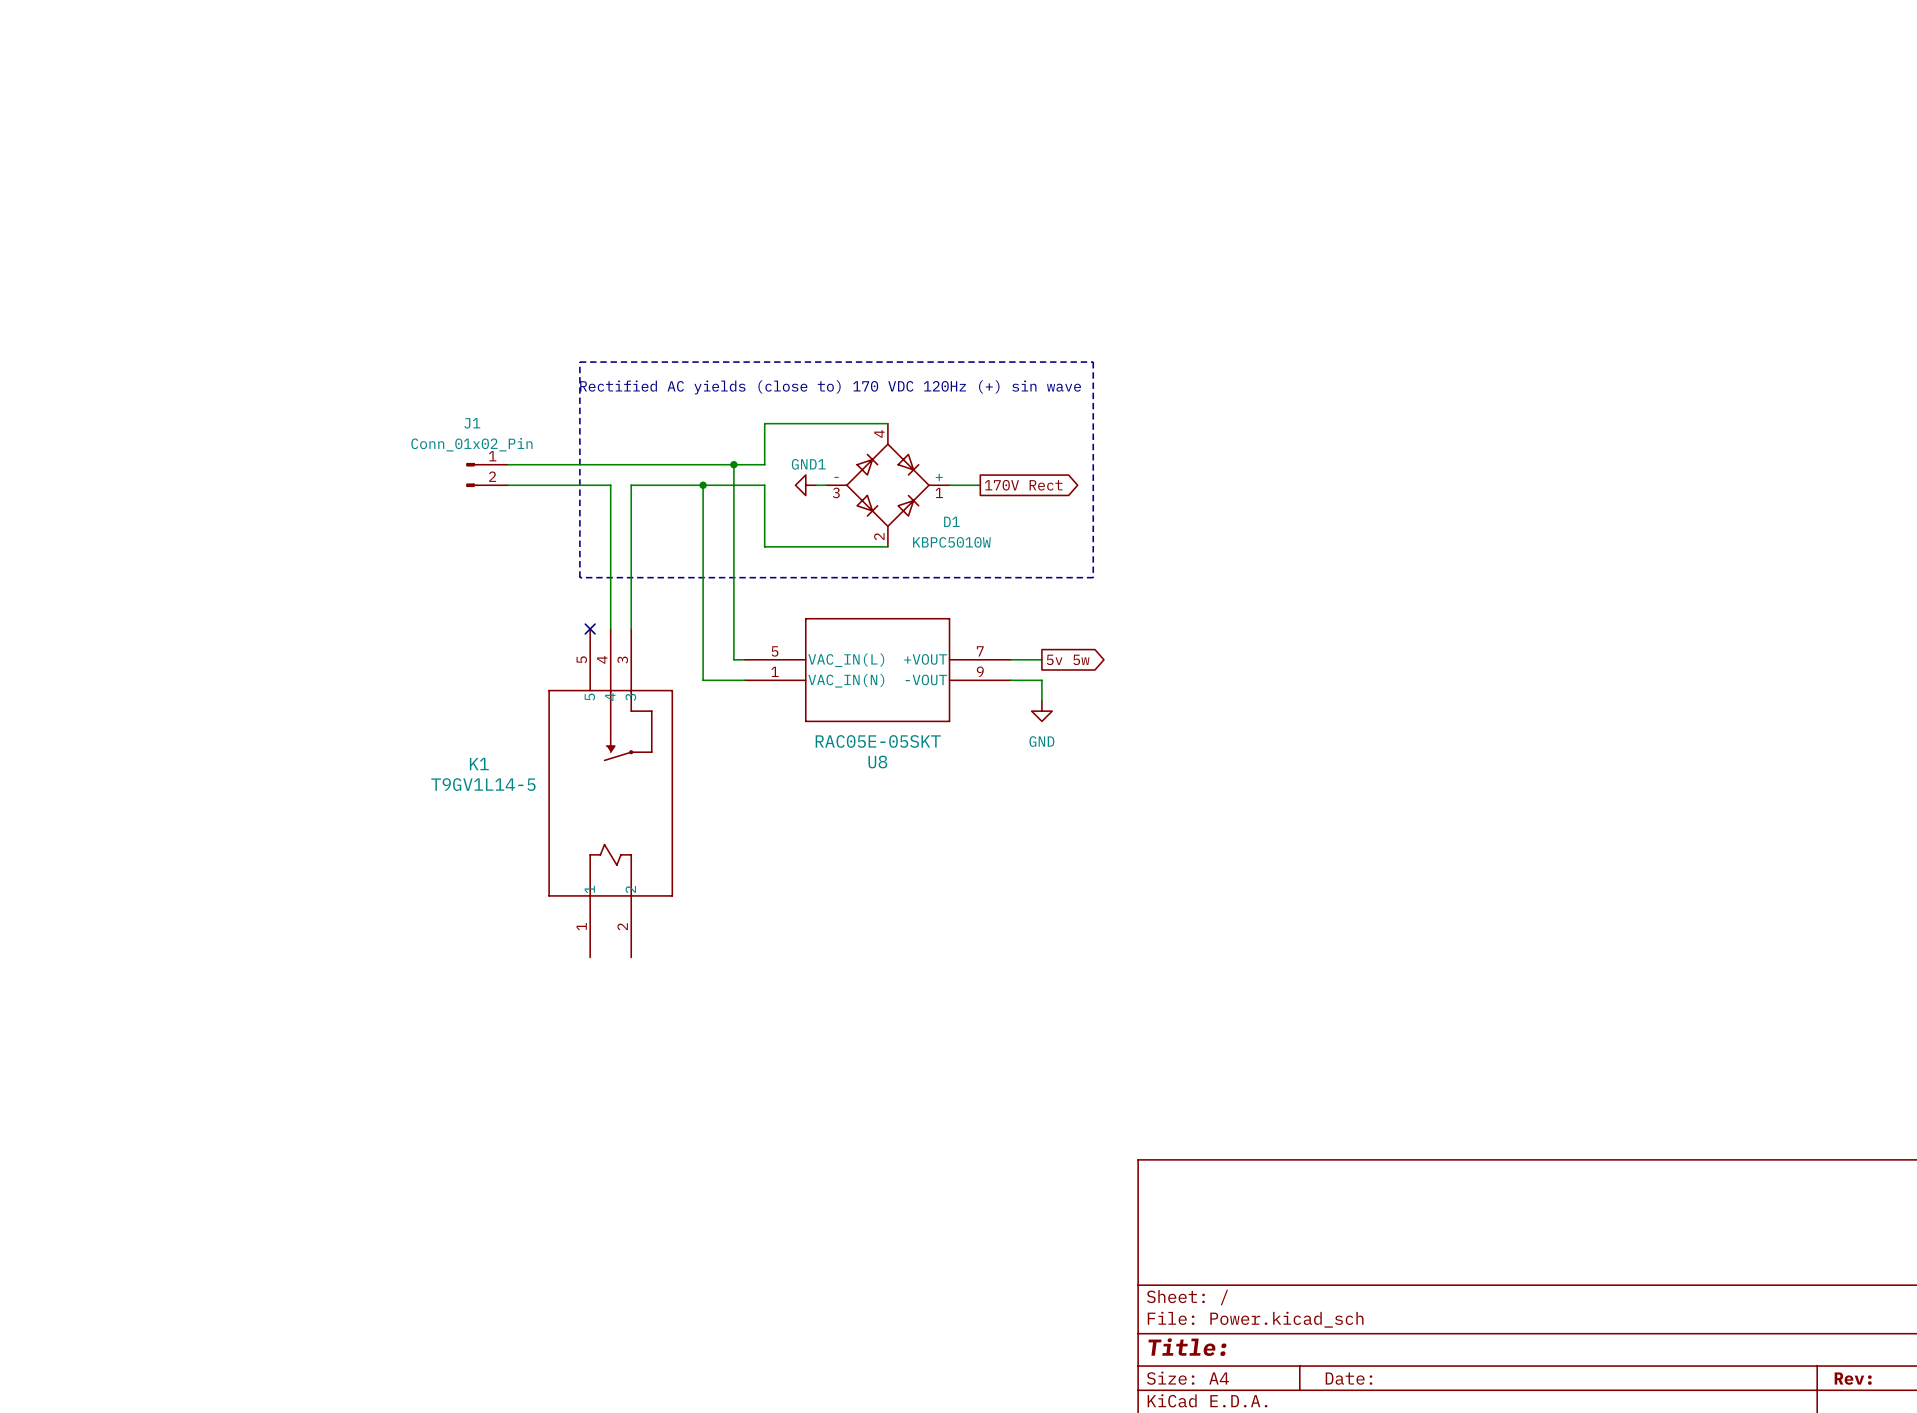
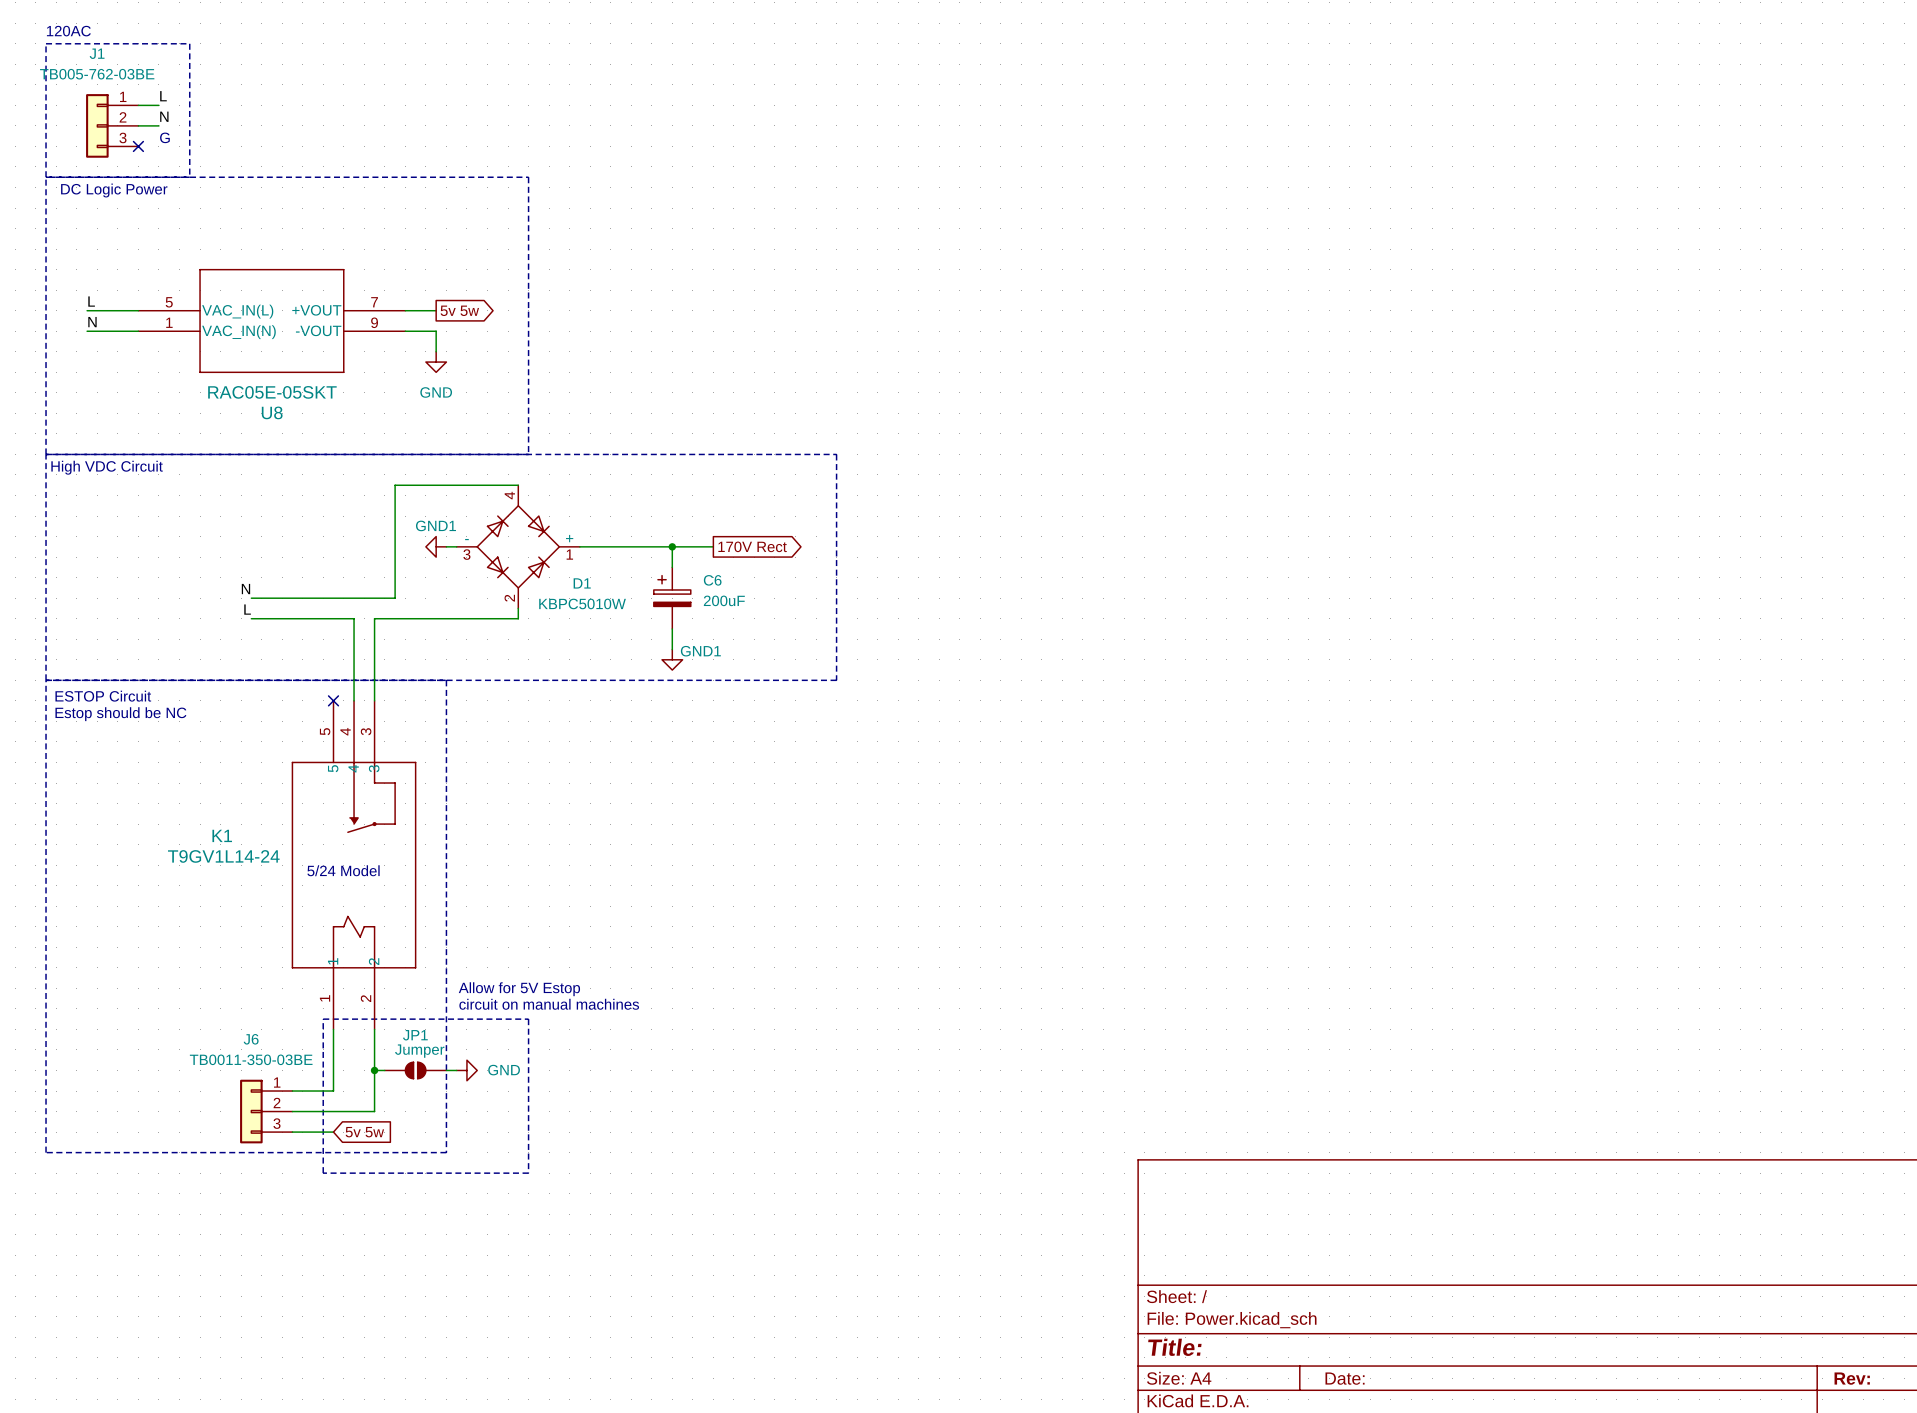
text: none -> 120AC (68, 31)
label: none -> L (163, 96)
wire: none -> (138, 105) (158, 105)
label: none -> N (164, 116)
wire: none -> (138, 125) (158, 125)
text: none -> G (164, 137)
no-connect mark: none -> (138, 146)
line: none -> (46, 177) (528, 177) (528, 454)
line: none -> (189, 177) (189, 43) (46, 43) (46, 1152) (446, 1152) (446, 680)
text: none -> DC Logic Power (114, 190)
label: none -> L (91, 301)
wire: none -> (87, 310) (138, 310)
wire: none -> (405, 310) (436, 310)
global label: none -> 5v 5w (459, 310)
label: none -> N (92, 322)
wire: none -> (87, 331) (138, 331)
wire: none -> (405, 331) (436, 331) (436, 351)
power symbol: none -> GND (436, 362)
line: (579, 362) (1093, 362) (1093, 577) (579, 577) (579, 362) -> none
text: Rectified AC yields (close to) 170 VDC 120Hz (+) sin wave (830, 387) -> none
J1 name position: J1 (472, 423) -> J1 (97, 53)
wire: (887, 423) (764, 423) (764, 464) (508, 464) -> none
J1 value: Conn_01x02_Pin (471, 444) -> TB005-762-03BE (97, 74)
line: none -> (46, 454) (836, 454) (836, 680) (46, 680)
J1 symbol: [466, 463, 509, 487] -> [86, 94, 139, 158]
wire: (733, 464) (733, 659) (744, 659) -> none
junction: (733, 464) -> none
text: none -> High VDC Circuit (107, 467)
wire: none -> (508, 485) (395, 485) (395, 598) (251, 598)
wire: (518, 485) (610, 485) (610, 628) -> none
wire: (703, 485) (703, 680) (744, 680) -> none
junction: (703, 485) -> none
power symbol: GND1 (805, 485) -> none
wire: (816, 485) (826, 485) -> none
D1 position: (887, 485) -> (518, 546)
wire: (949, 485) (980, 485) -> none
global label: 170V Rect (1023, 485) -> none
power symbol: none -> GND1 (436, 546)
wire: none -> (446, 546) (456, 546)
wire: none -> (579, 546) (713, 546)
wire: none -> (672, 546) (672, 567)
junction: none -> (672, 546)
global label: none -> 170V Rect (752, 546)
wire: (887, 546) (764, 546) (764, 485) (631, 485) (631, 628) -> none
label: none -> N (245, 589)
C6: none -> 200uF (672, 598)
wire: none -> (518, 608) (518, 618) (374, 618) (374, 700)
label: none -> L (247, 609)
wire: none -> (251, 618) (354, 618) (354, 700)
no-connect mark: (590, 628) -> none
wire: none -> (672, 628) (672, 649)
power symbol: none -> GND1 (672, 659)
wire: (1011, 659) (1041, 659) -> none
global label: 5v 5w (1068, 659) -> none
U8 position: (877, 670) -> (271, 320)
wire: (1011, 680) (1041, 680) (1041, 700) -> none
text: none -> ESTOP Circuit (103, 696)
no-connect mark: none -> (333, 700)
power symbol: GND (1041, 711) -> none
text: none -> Estop should be NC (120, 714)
K1 value: T9GV1L14-5 (483, 784) -> T9GV1L14-24 (223, 856)
K1 position: (610, 793) -> (354, 865)
text: none -> 5/24 Model (343, 870)
text: none -> Allow for 5V Estop (519, 989)
text: none -> circuit on manual machines (549, 1004)
line: none -> (323, 1019) (528, 1019) (528, 1173) (323, 1173) (323, 1019)
wire: none -> (333, 1029) (333, 1091) (292, 1091)
wire: none -> (374, 1029) (374, 1111) (292, 1111)
wire: none -> (374, 1070) (384, 1070)
junction: none -> (374, 1070)
JP1: none -> Jumper (415, 1070)
wire: none -> (446, 1070) (456, 1070)
power symbol: none -> GND (466, 1070)
J6: none -> TB0011-350-03BE (266, 1111)
wire: none -> (292, 1132) (333, 1132)
global label: none -> 5v 5w (364, 1132)

